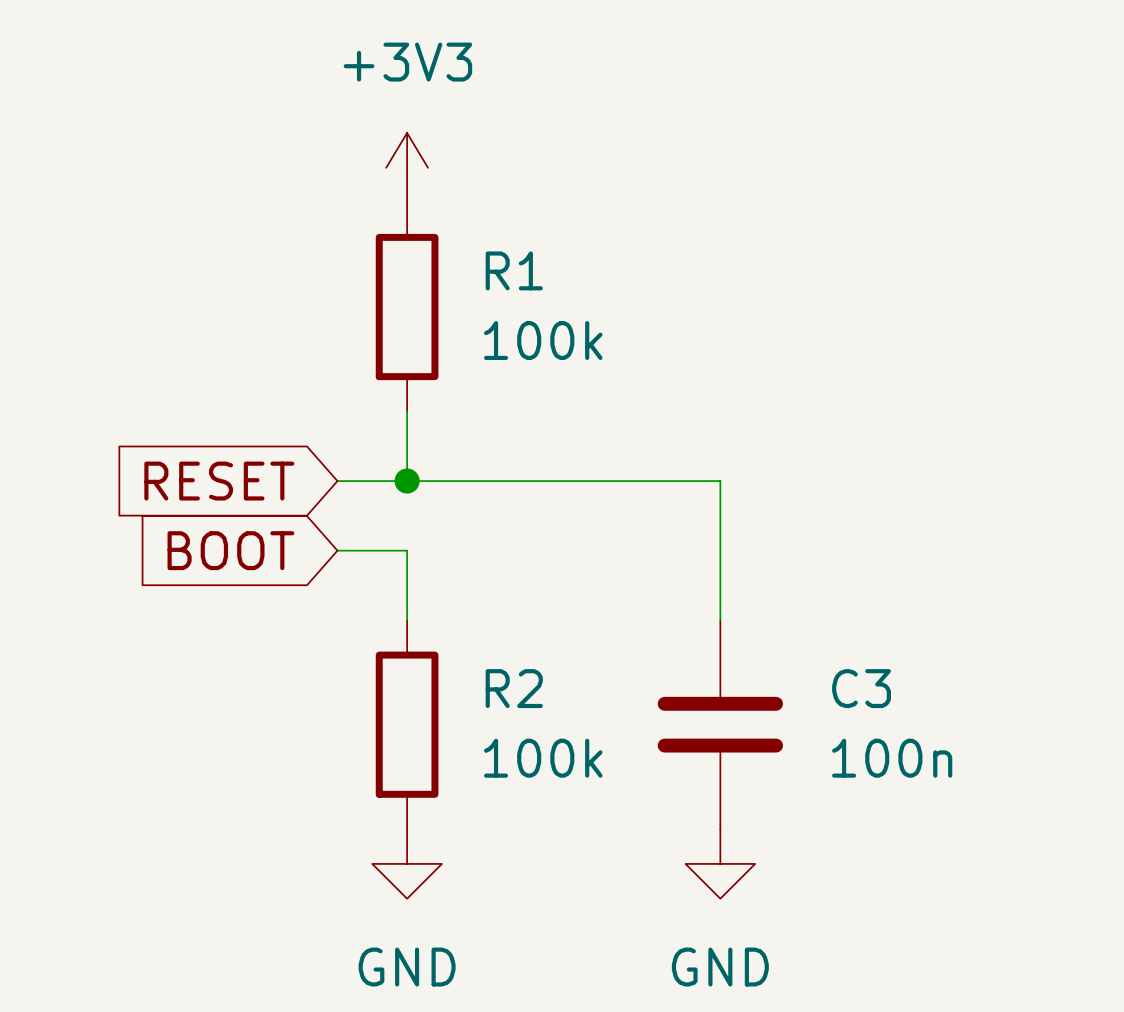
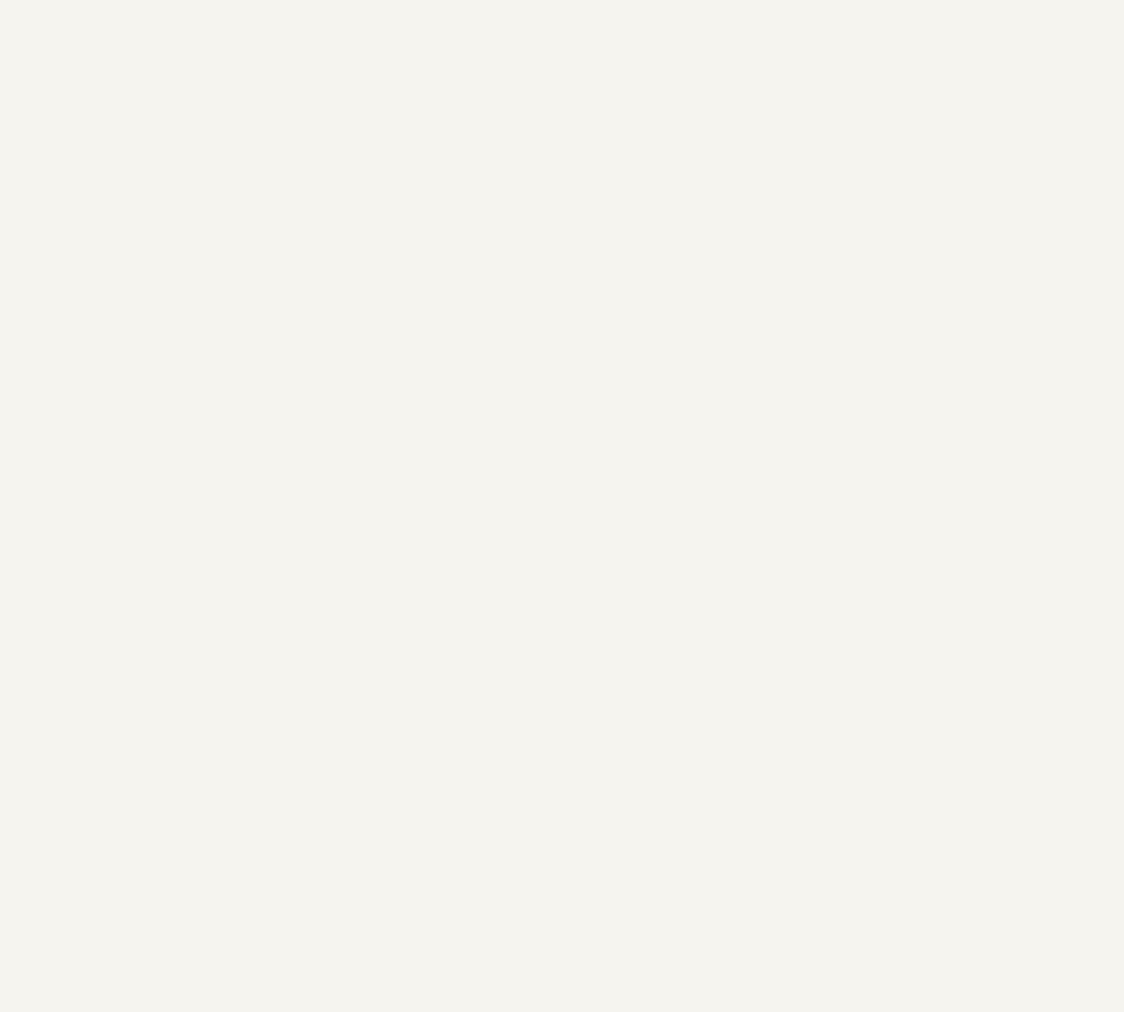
power symbol: +3V3 (407, 167) -> none
R1: 100k (407, 307) -> none
wire: (407, 411) (407, 481) -> none
global label: RESET (219, 481) -> none
wire: (337, 481) (720, 481) (720, 620) -> none
junction: (407, 481) -> none
global label: BOOT (230, 550) -> none
wire: (337, 550) (407, 550) (407, 620) -> none
R2: 100k (407, 724) -> none
C3: 100n (720, 724) -> none
power symbol: GND (407, 863) -> none
power symbol: GND (720, 863) -> none

